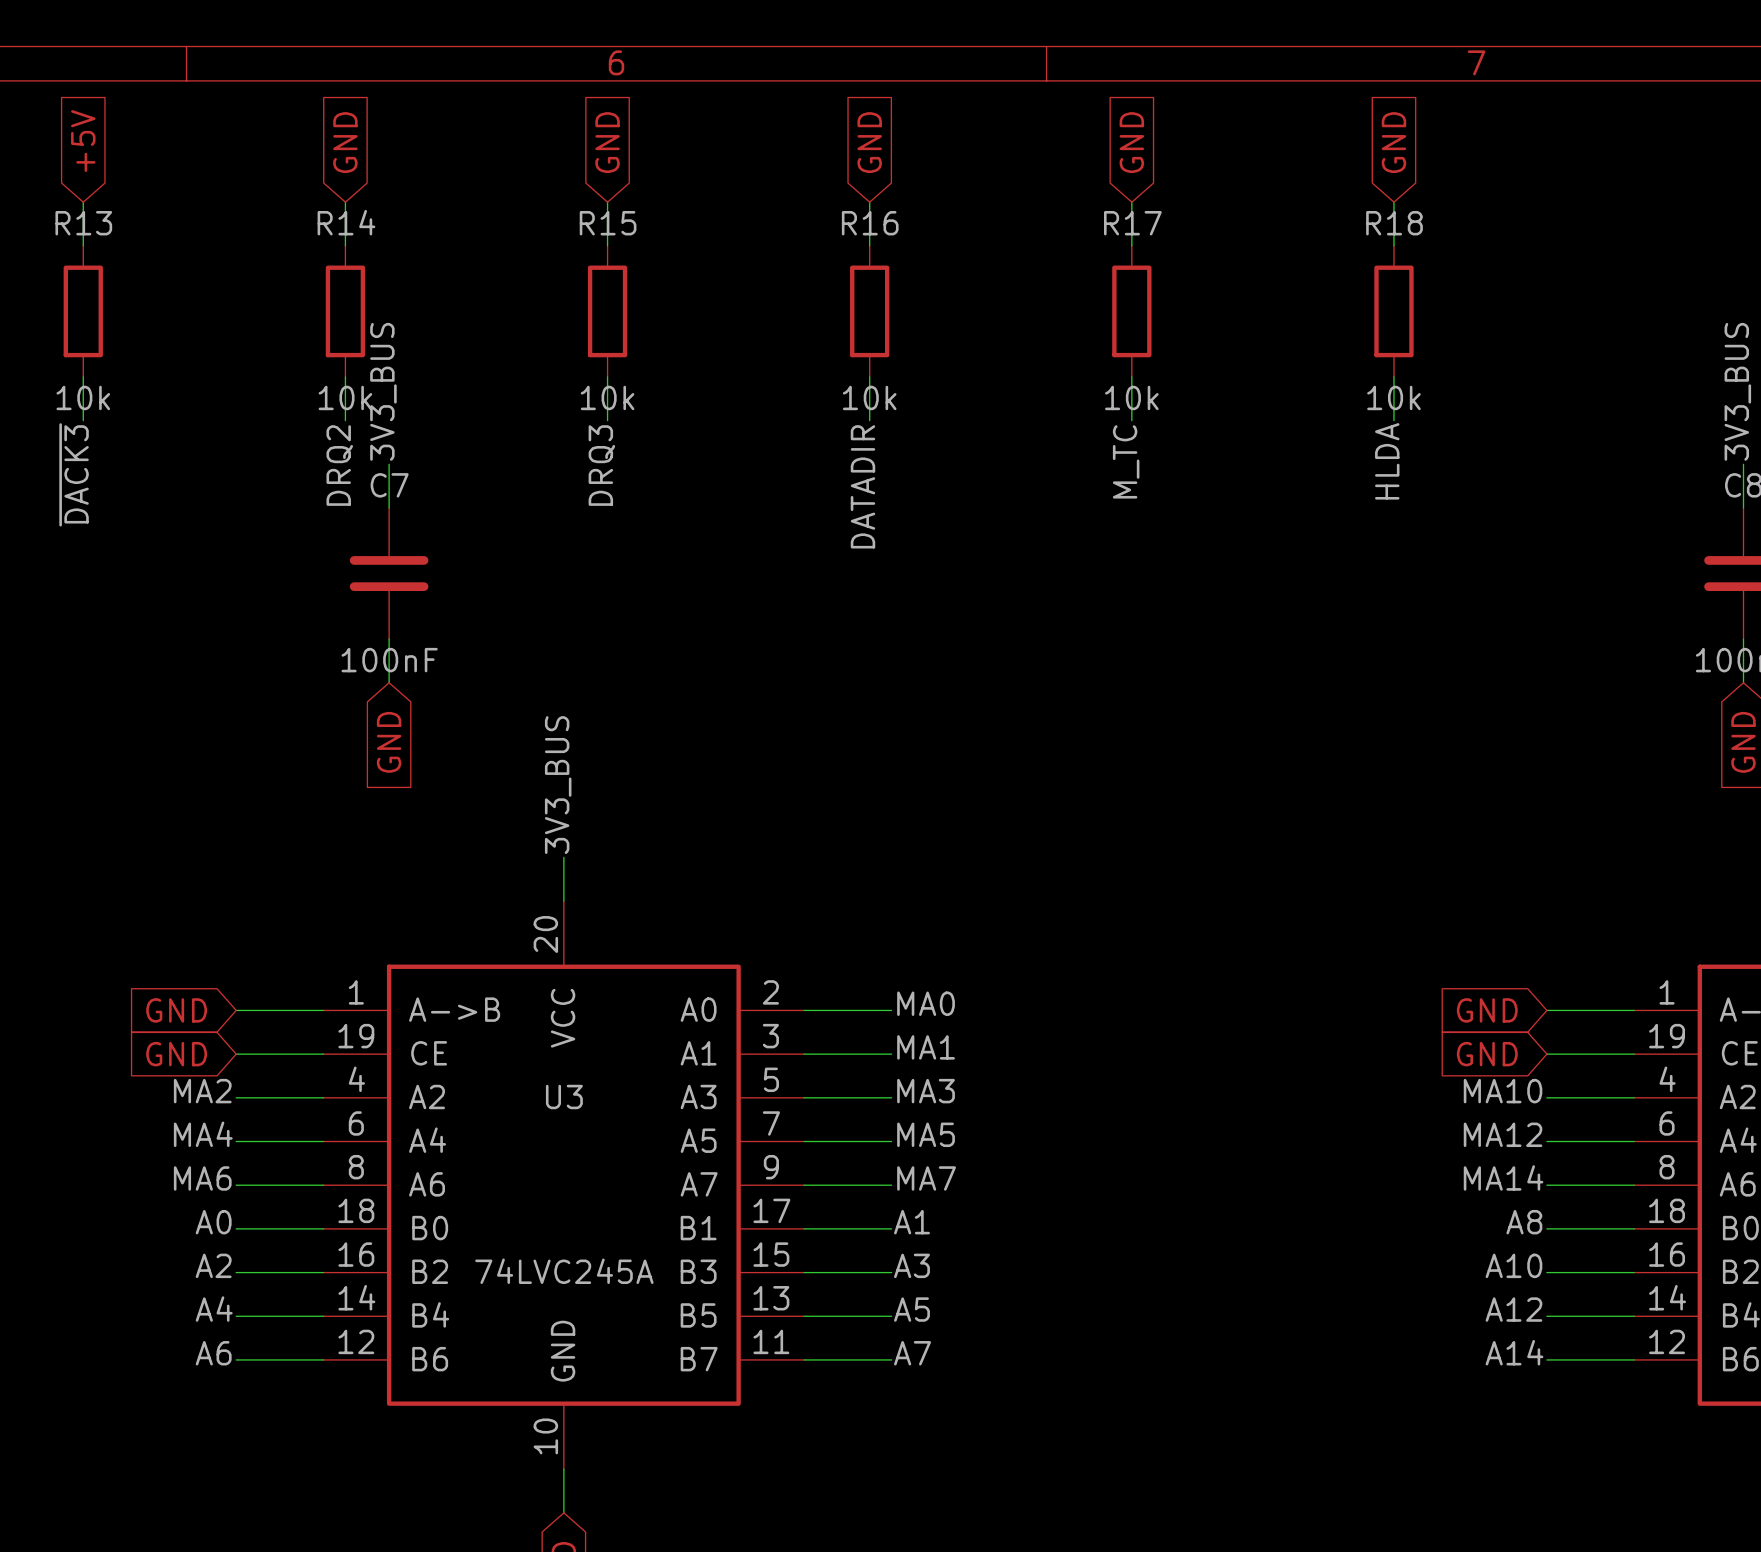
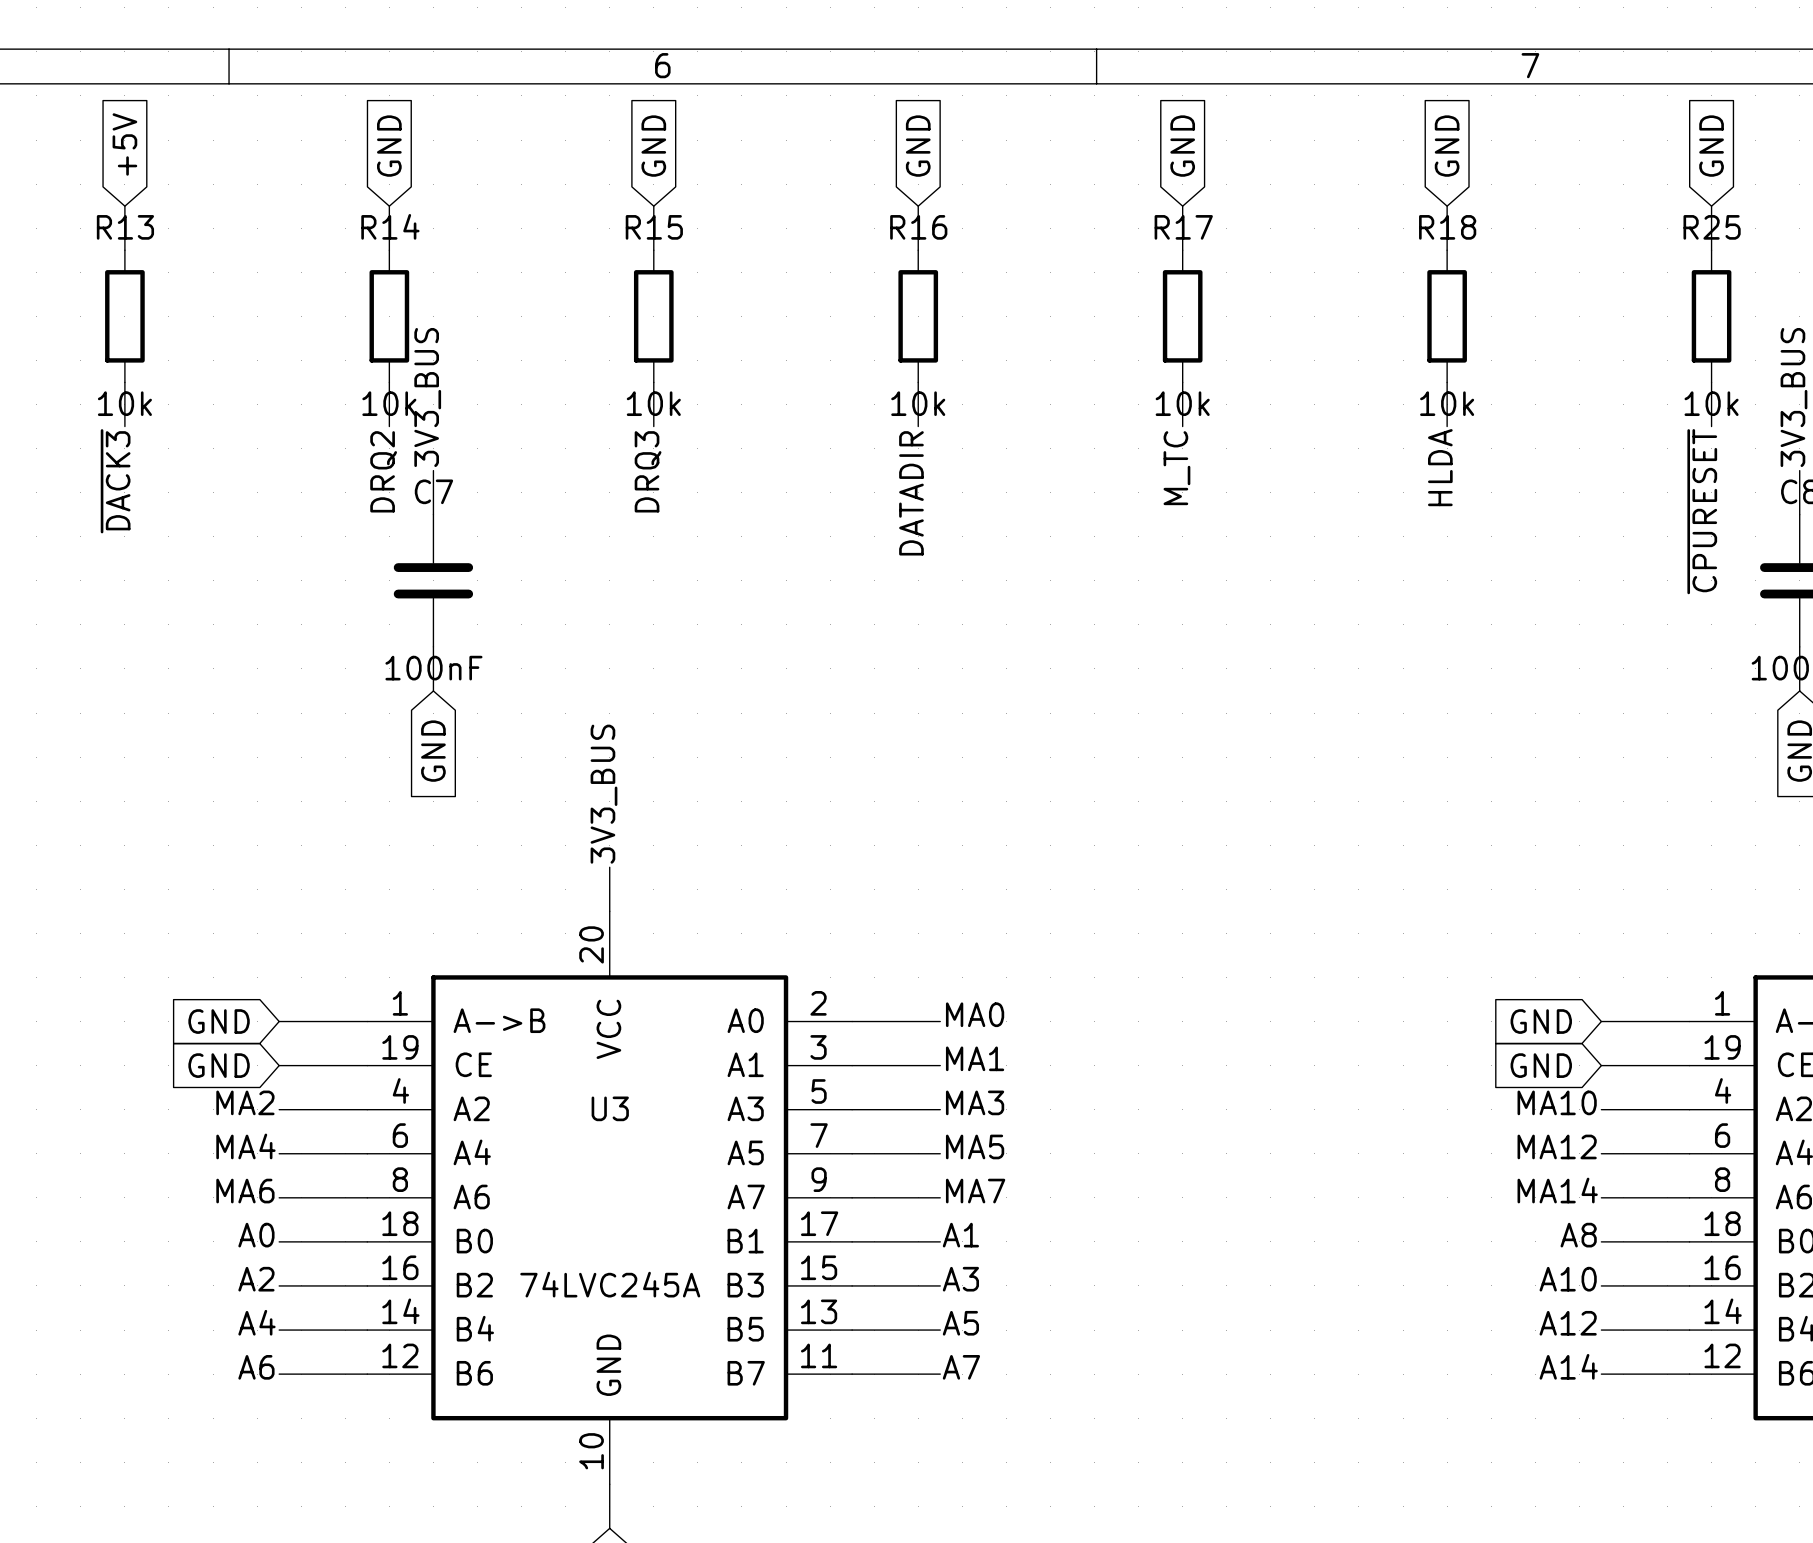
global label: none -> GND (1711, 146)
wire: none -> (1711, 206) (1711, 250)
R25: none -> 10k (1711, 316)
wire: none -> (1711, 382) (1711, 426)
label: none -> ~{CPURESET} (1702, 511)

